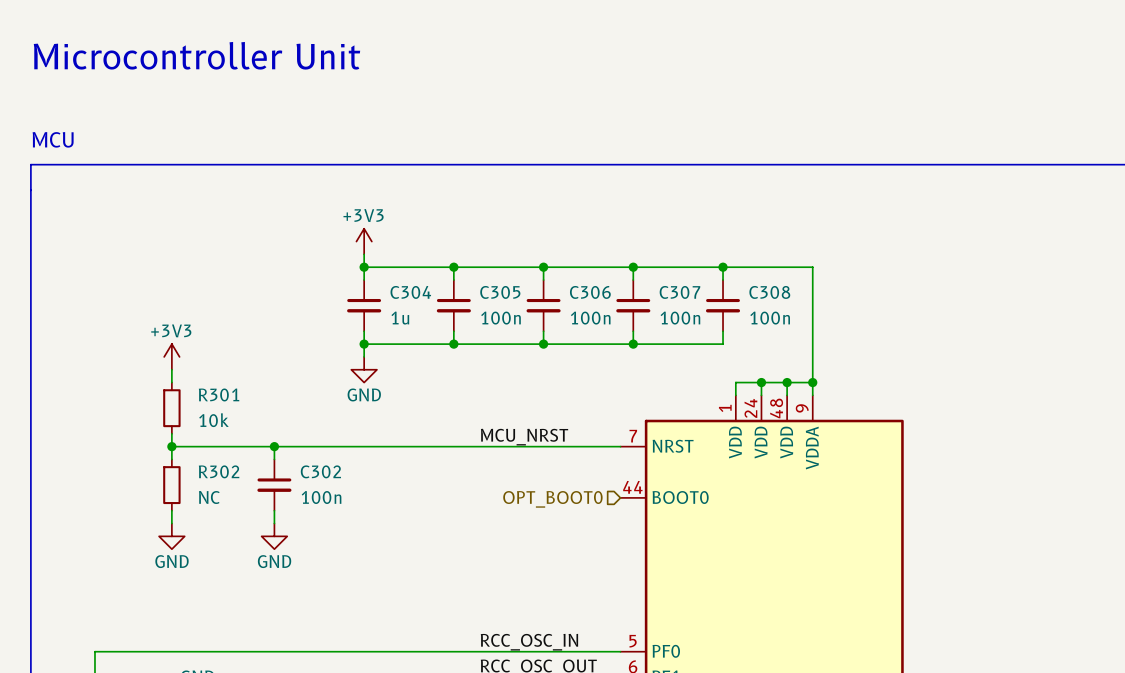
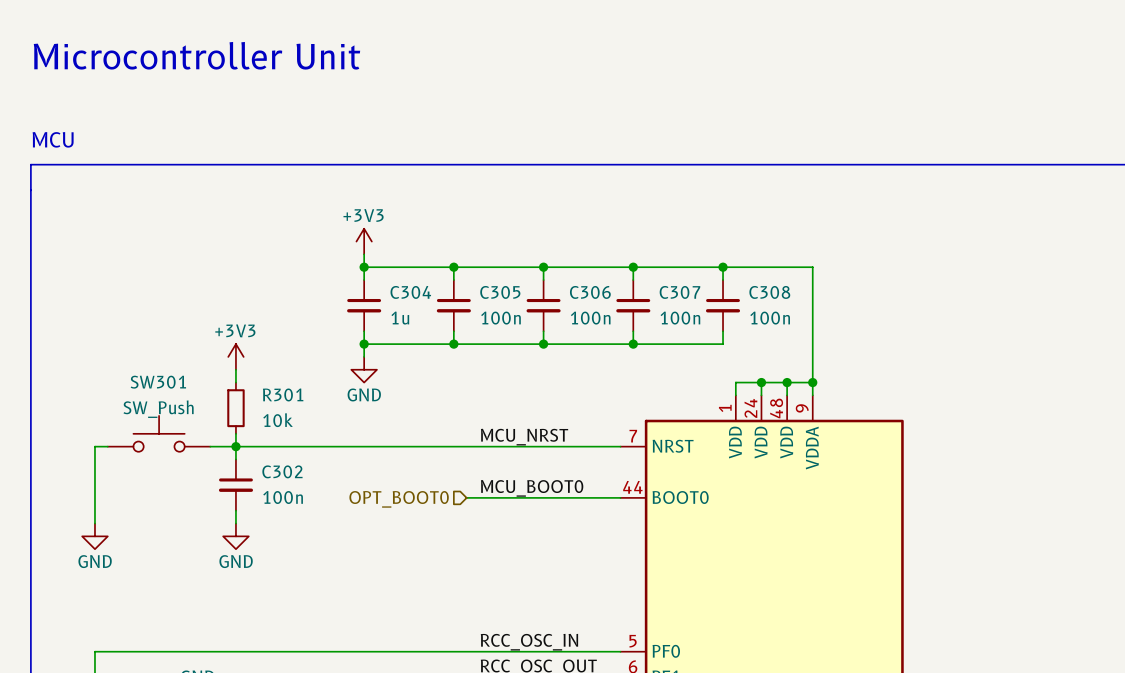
power symbol position: +3V3 (171, 356) -> +3V3 (235, 356)
wire: (171, 369) (171, 382) -> (235, 369) (235, 382)
R301 position: (171, 408) -> (235, 408)
SW301: none -> SW_Push (159, 433)
wire: (171, 433) (171, 459) -> (235, 433) (235, 459)
wire: none -> (107, 446) (94, 446) (94, 523)
junction: (171, 446) -> none
junction: none -> (235, 446)
wire: (274, 446) (274, 459) -> none
junction: (274, 446) -> none
R302: NC (171, 485) -> none
C302 position: (274, 485) -> (235, 485)
label: none -> MCU_BOOT0 (532, 488)
wire: none -> (466, 497) (620, 497)
hierarchical label position: OPT_BOOT0 (552, 499) -> OPT_BOOT0 (399, 499)
wire: (171, 510) (171, 523) -> (235, 510) (235, 523)
wire: (274, 510) (274, 523) -> none
power symbol: none -> GND (94, 536)
power symbol: GND (171, 536) -> none
power symbol: none -> GND (235, 536)
power symbol: GND (274, 536) -> none

